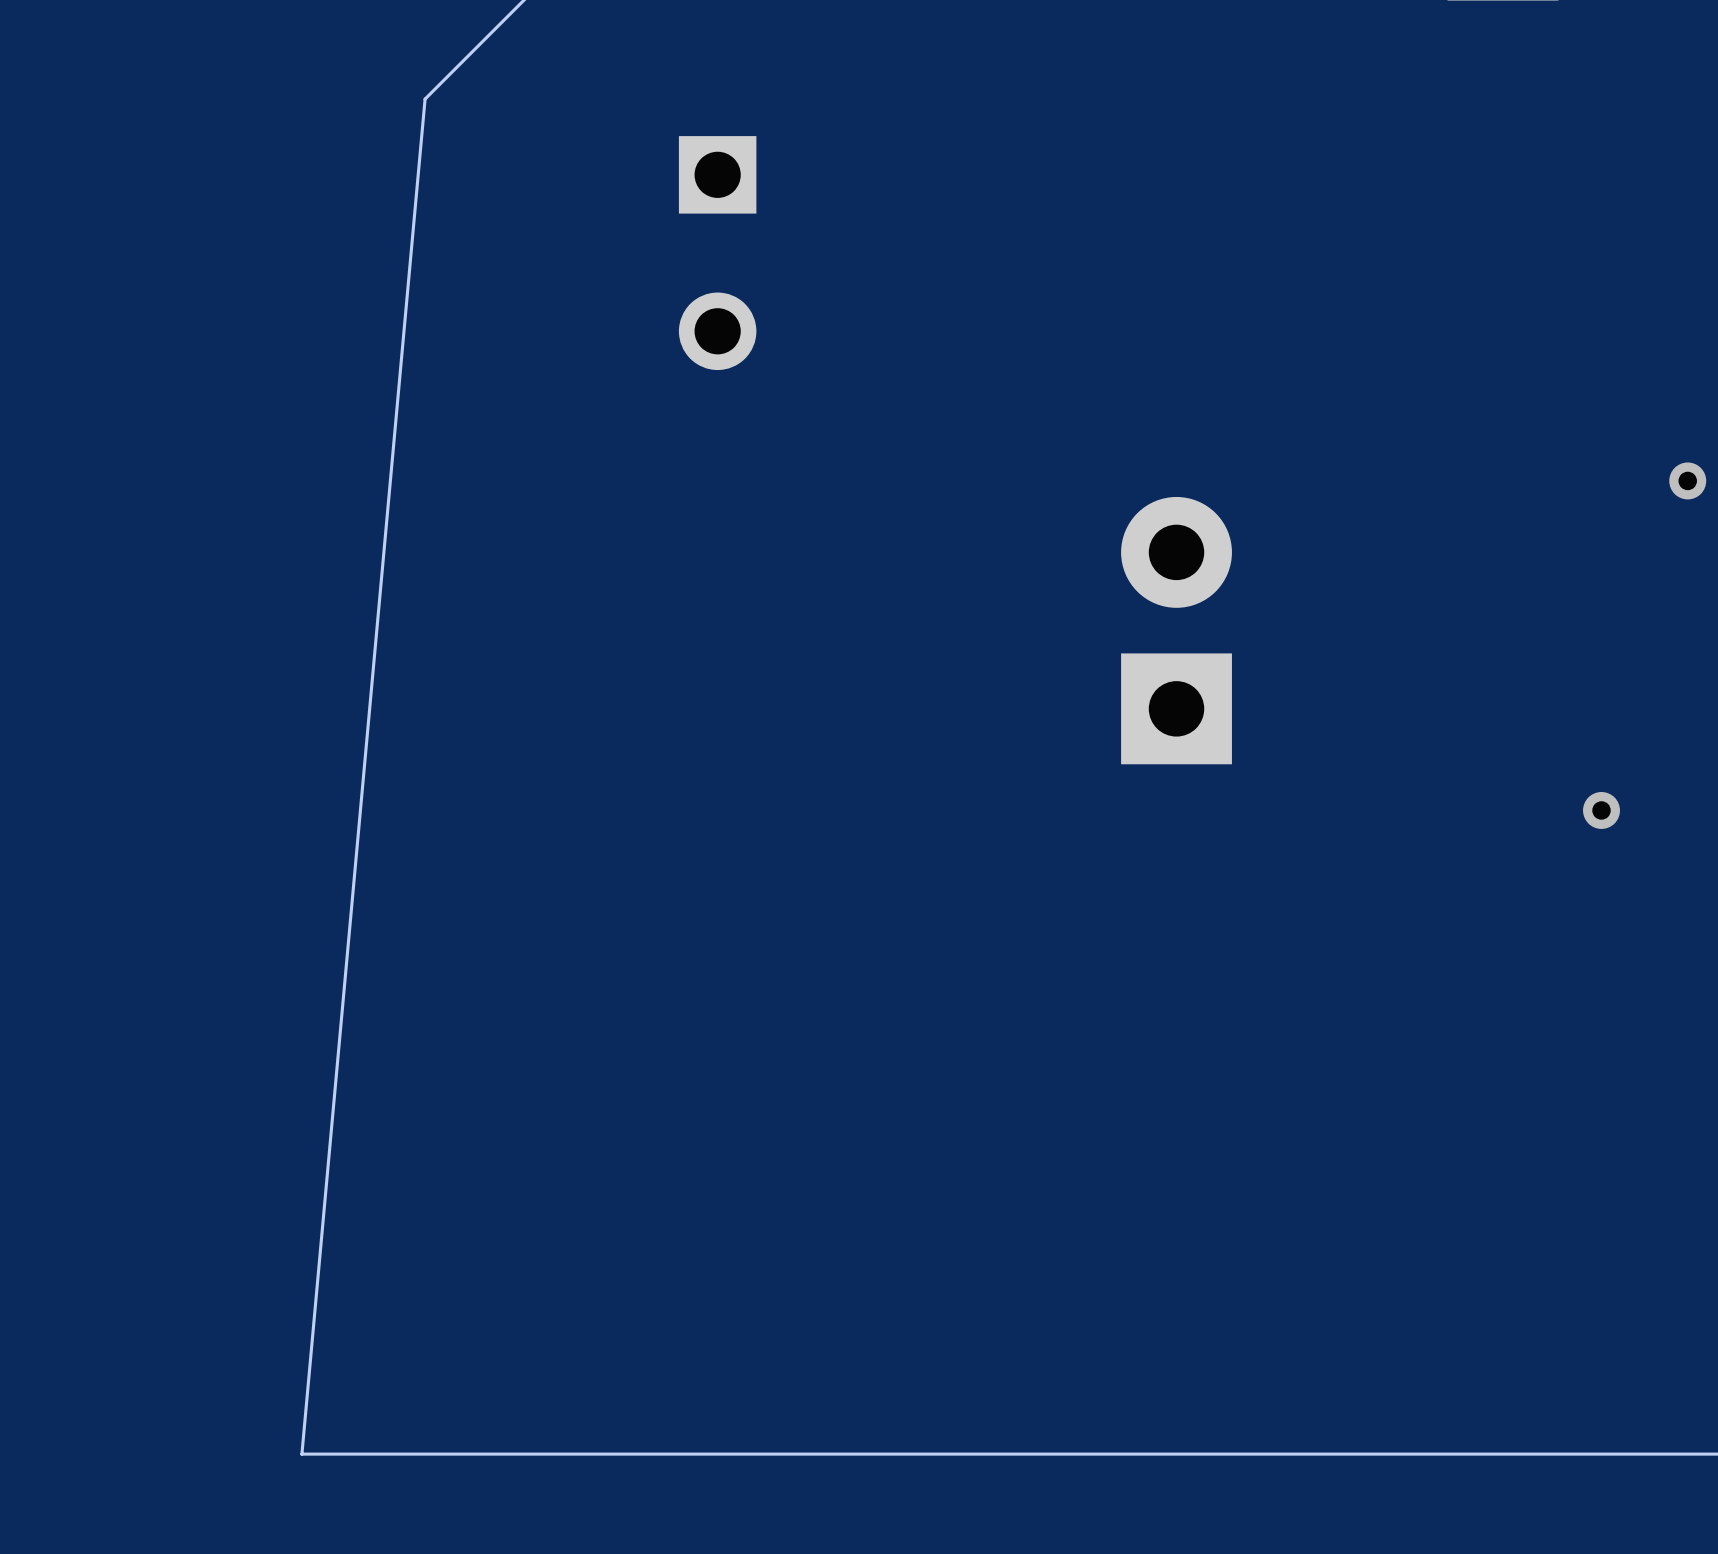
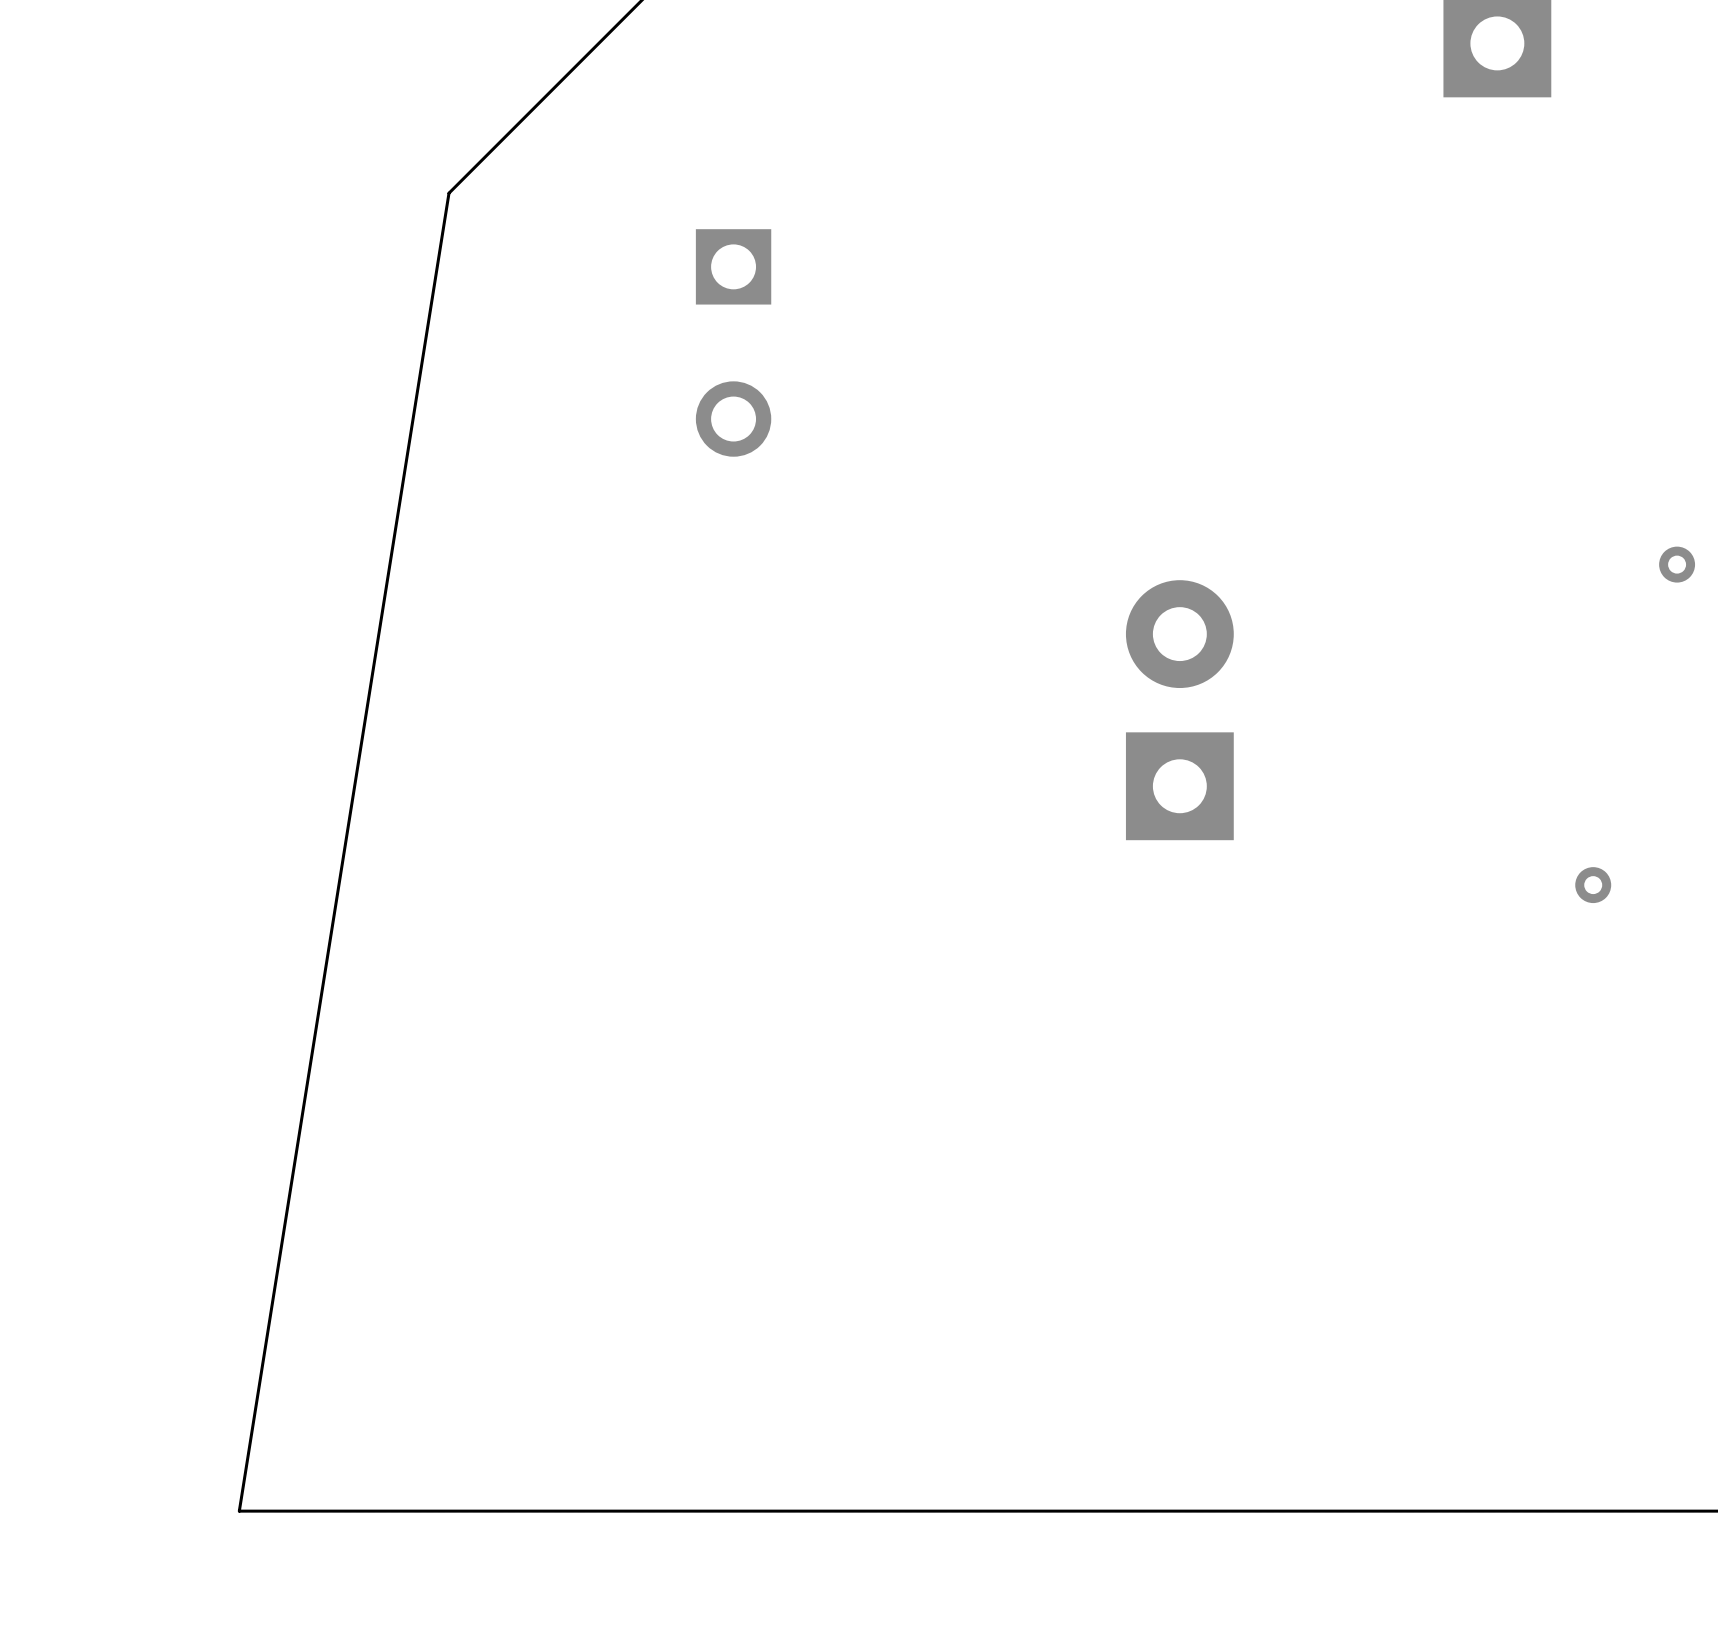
board edge: (425, 99) (301, 1454) -> (449, 193) (239, 1511) (329, 1511)

